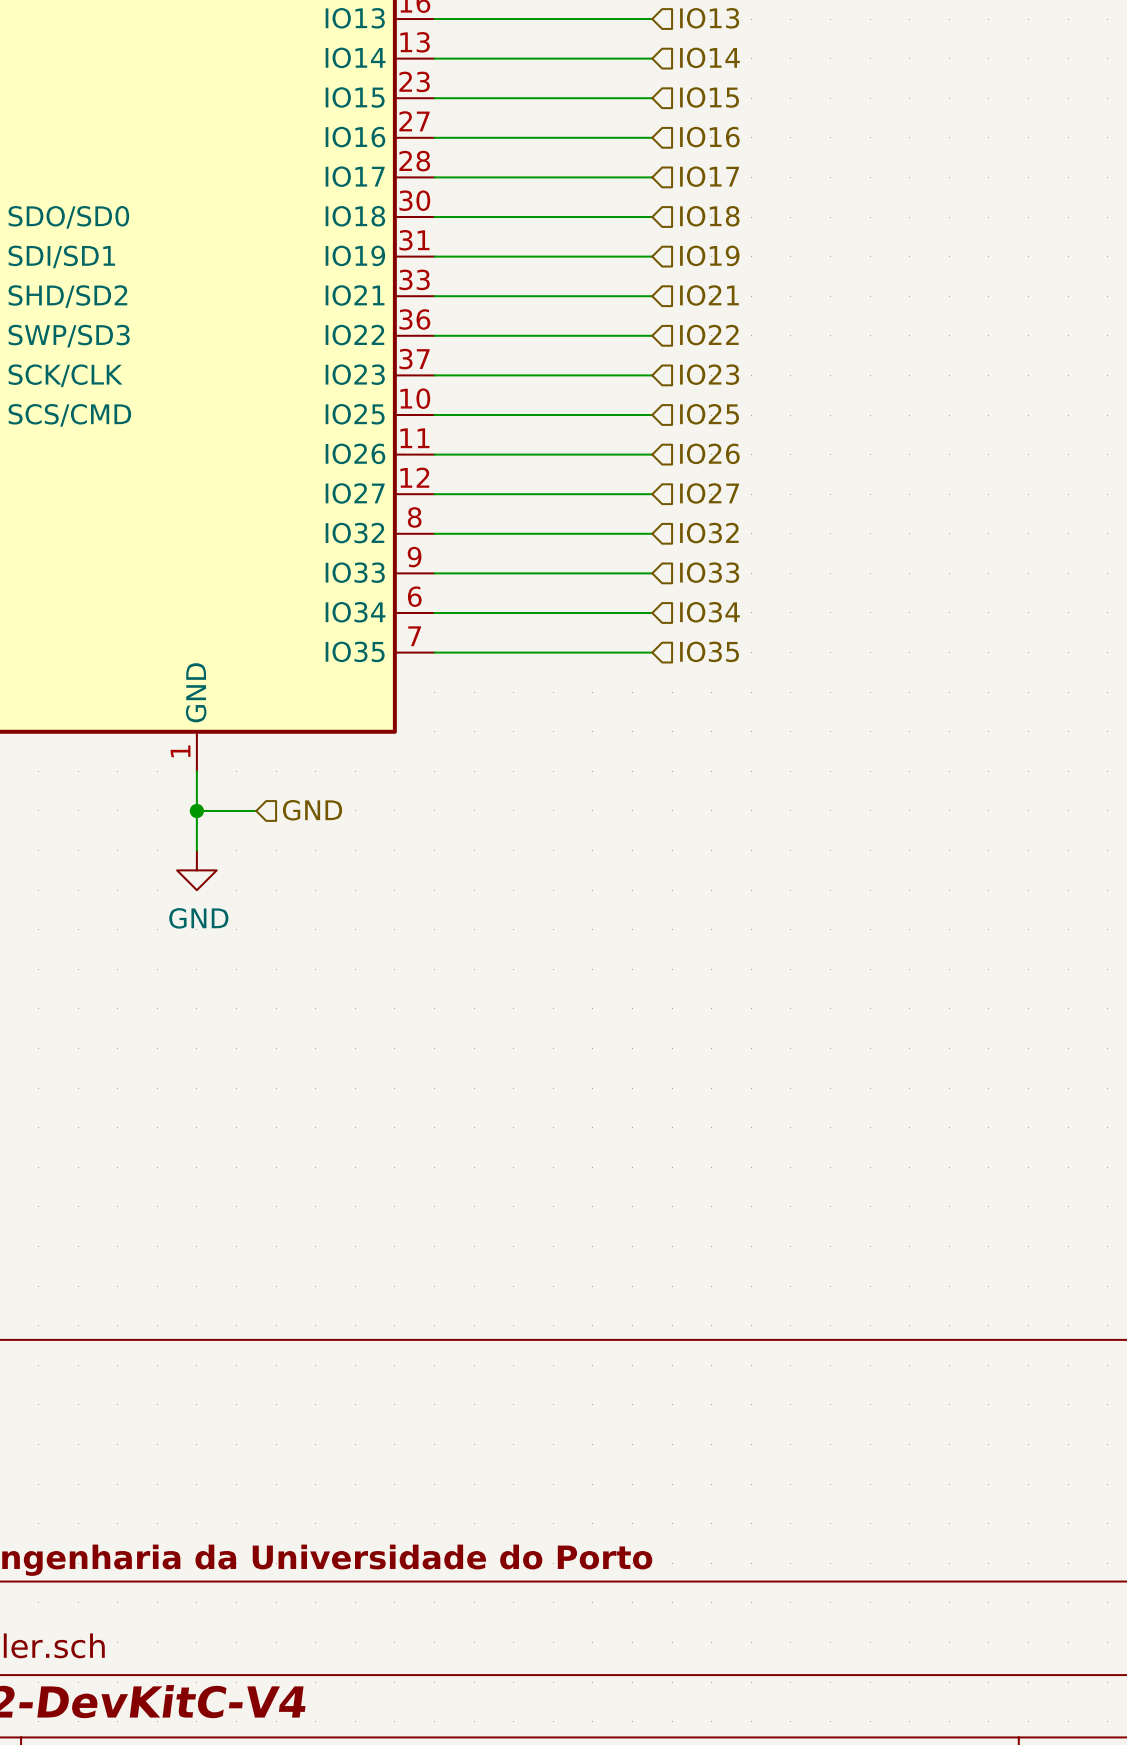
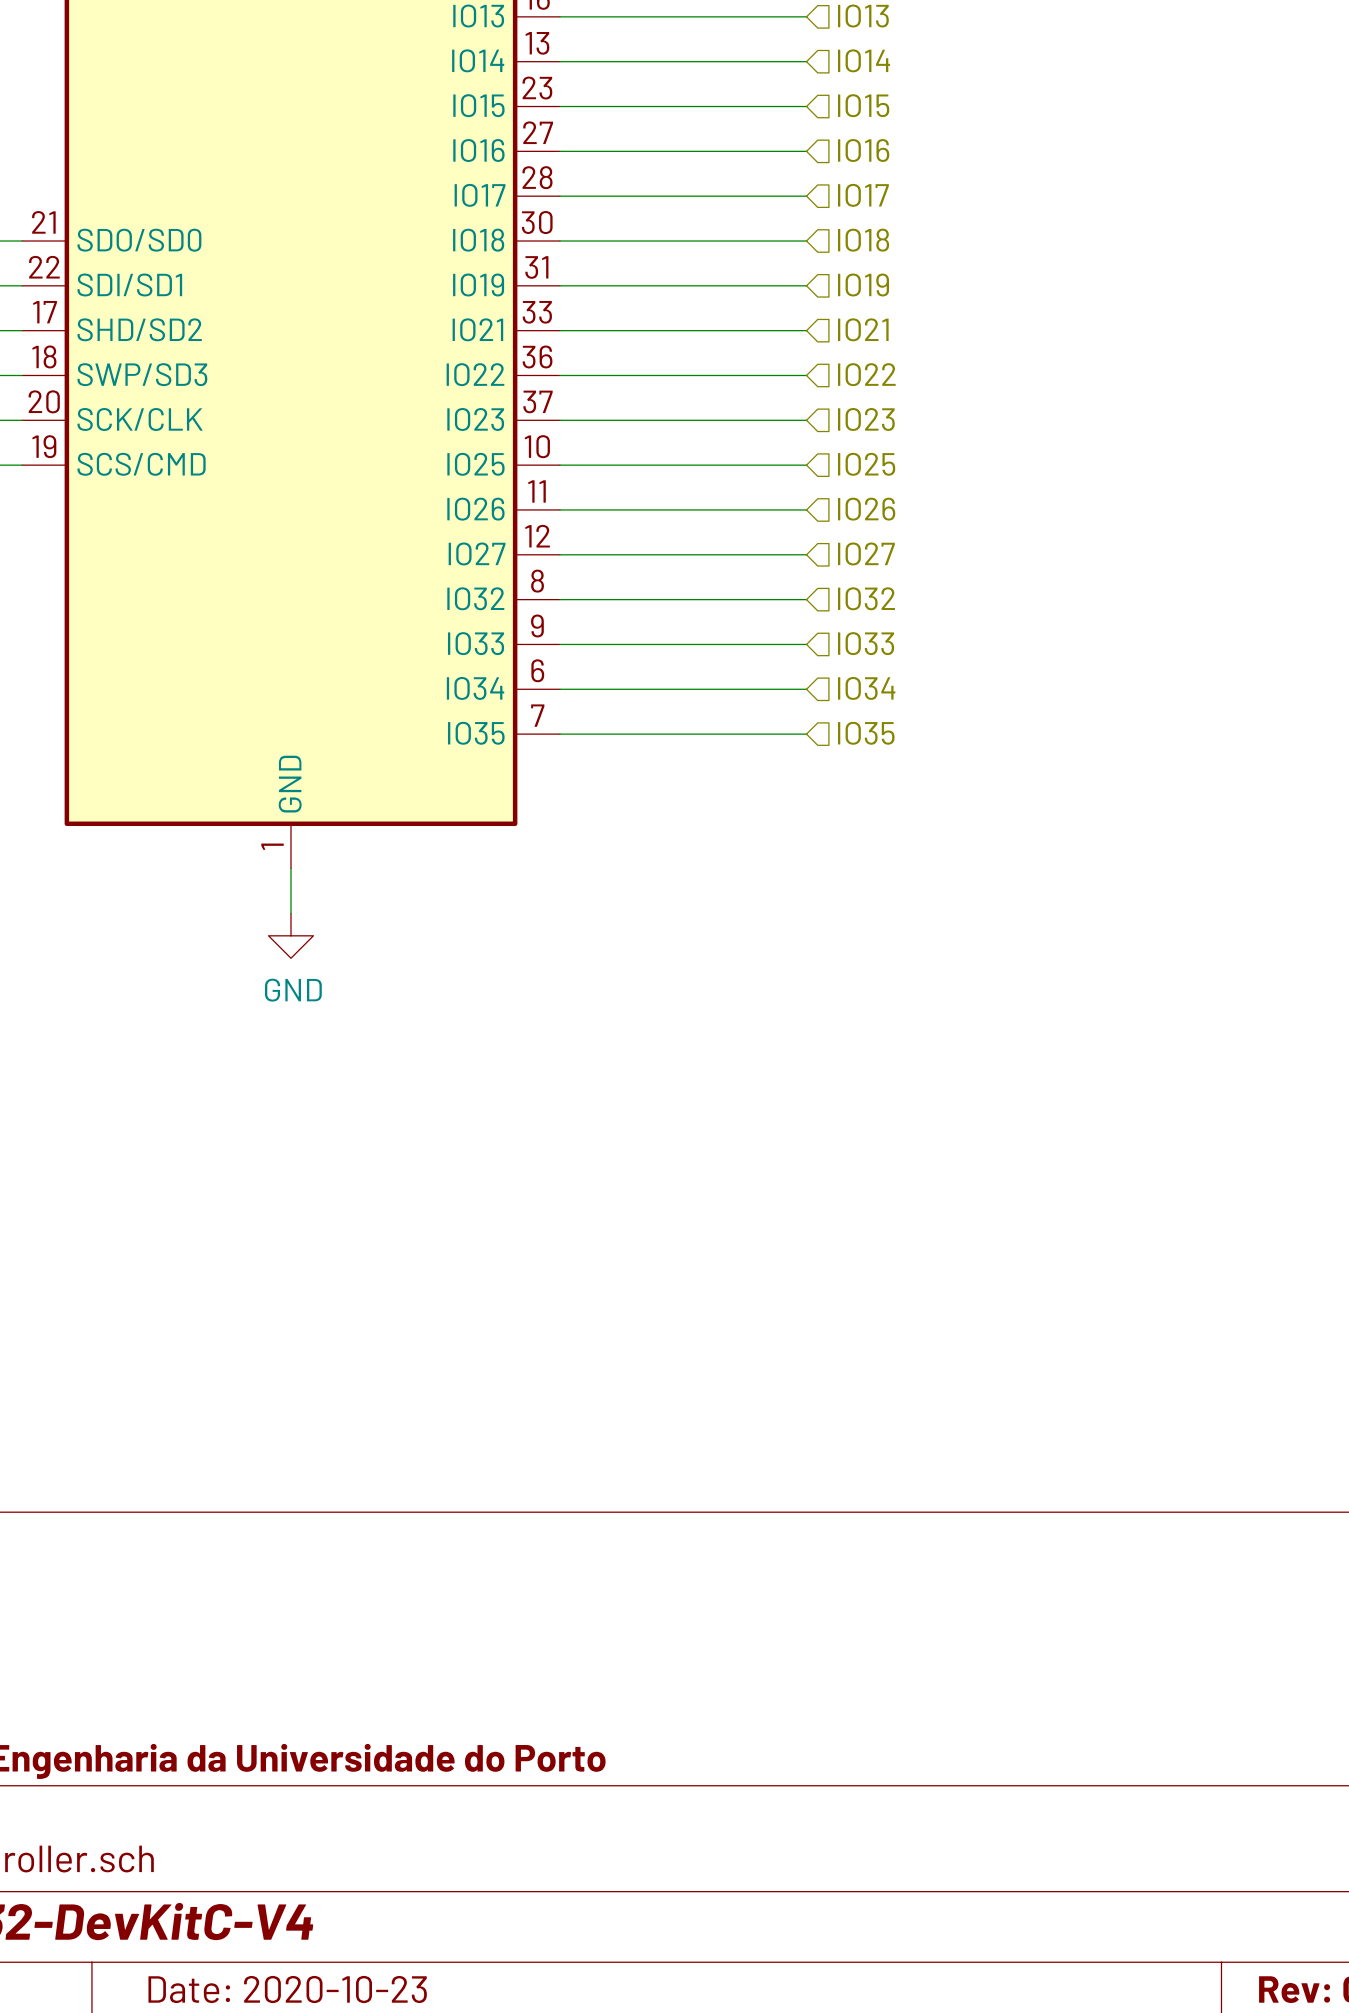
junction: (196, 810) -> none
wire: (256, 810) (196, 810) (196, 850) -> none
hierarchical label: GND (312, 810) -> none
power symbol position: GND (196, 870) -> GND (291, 935)

